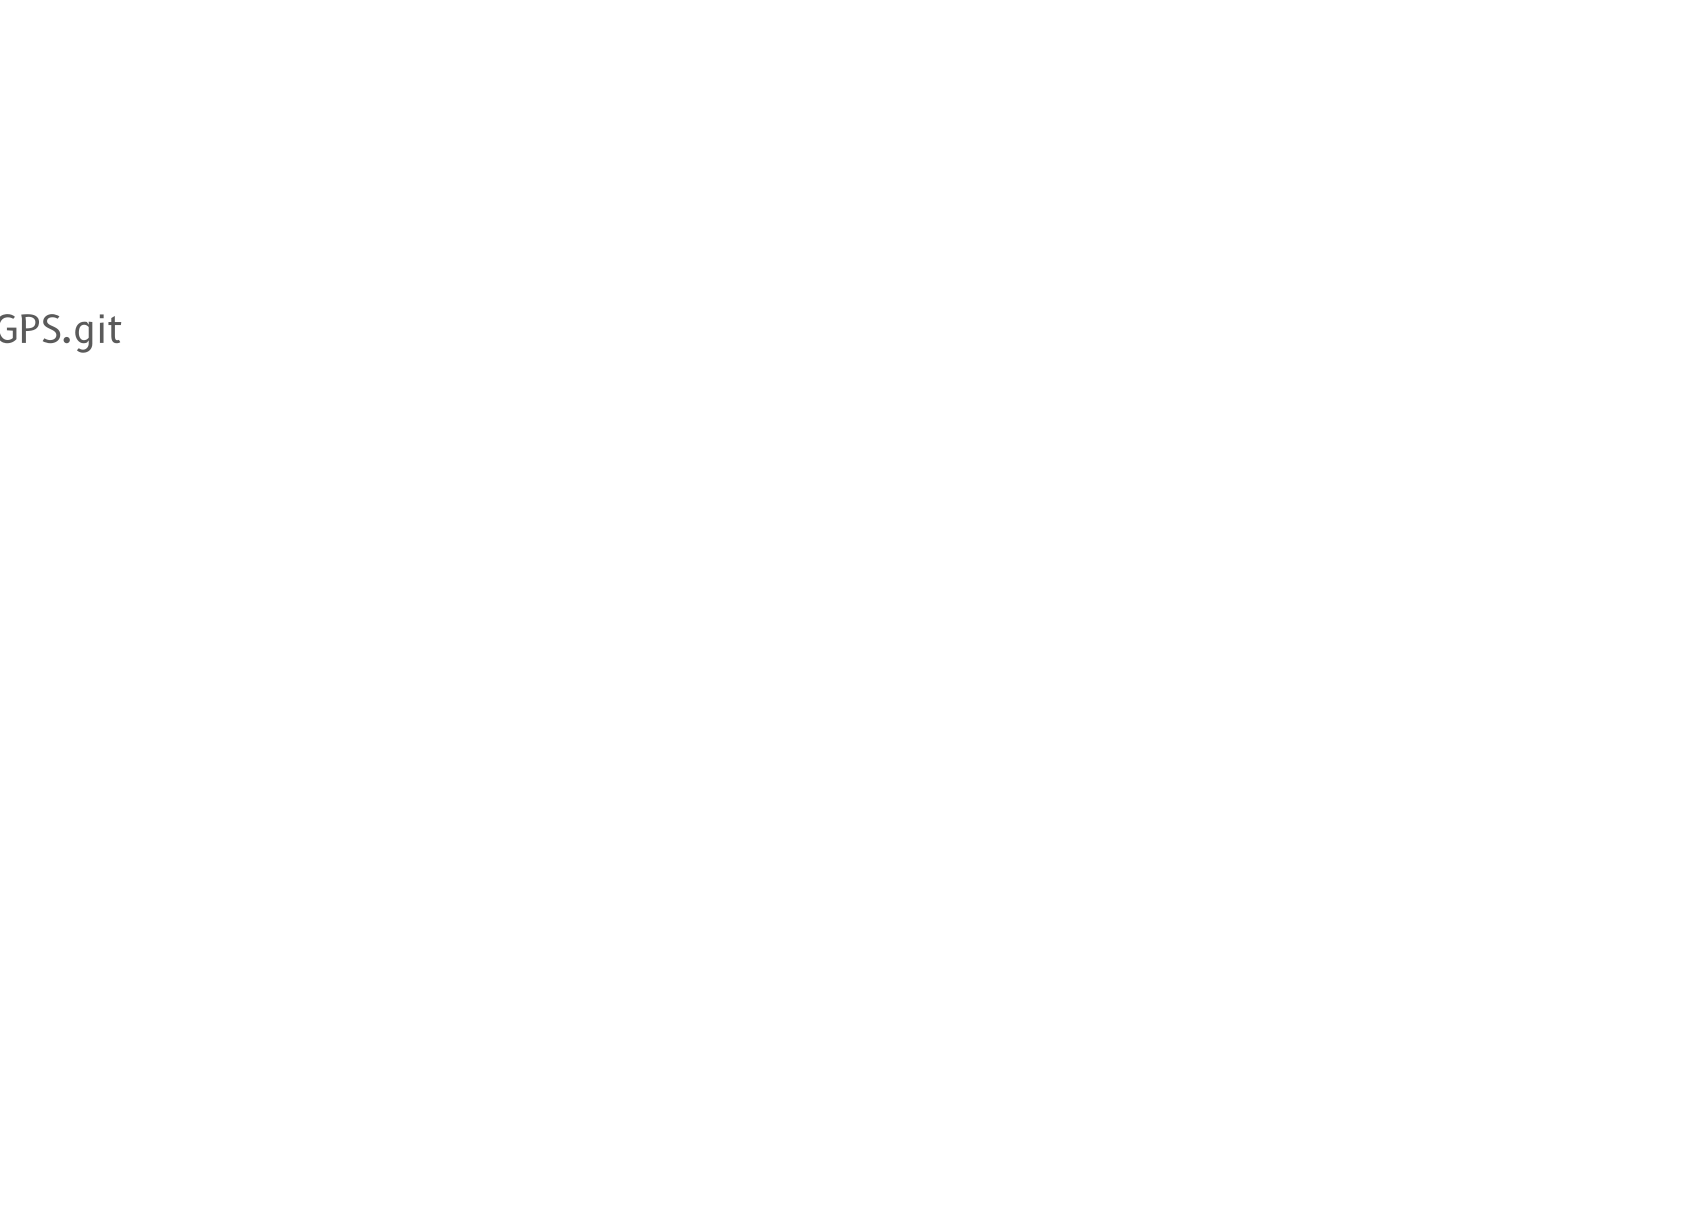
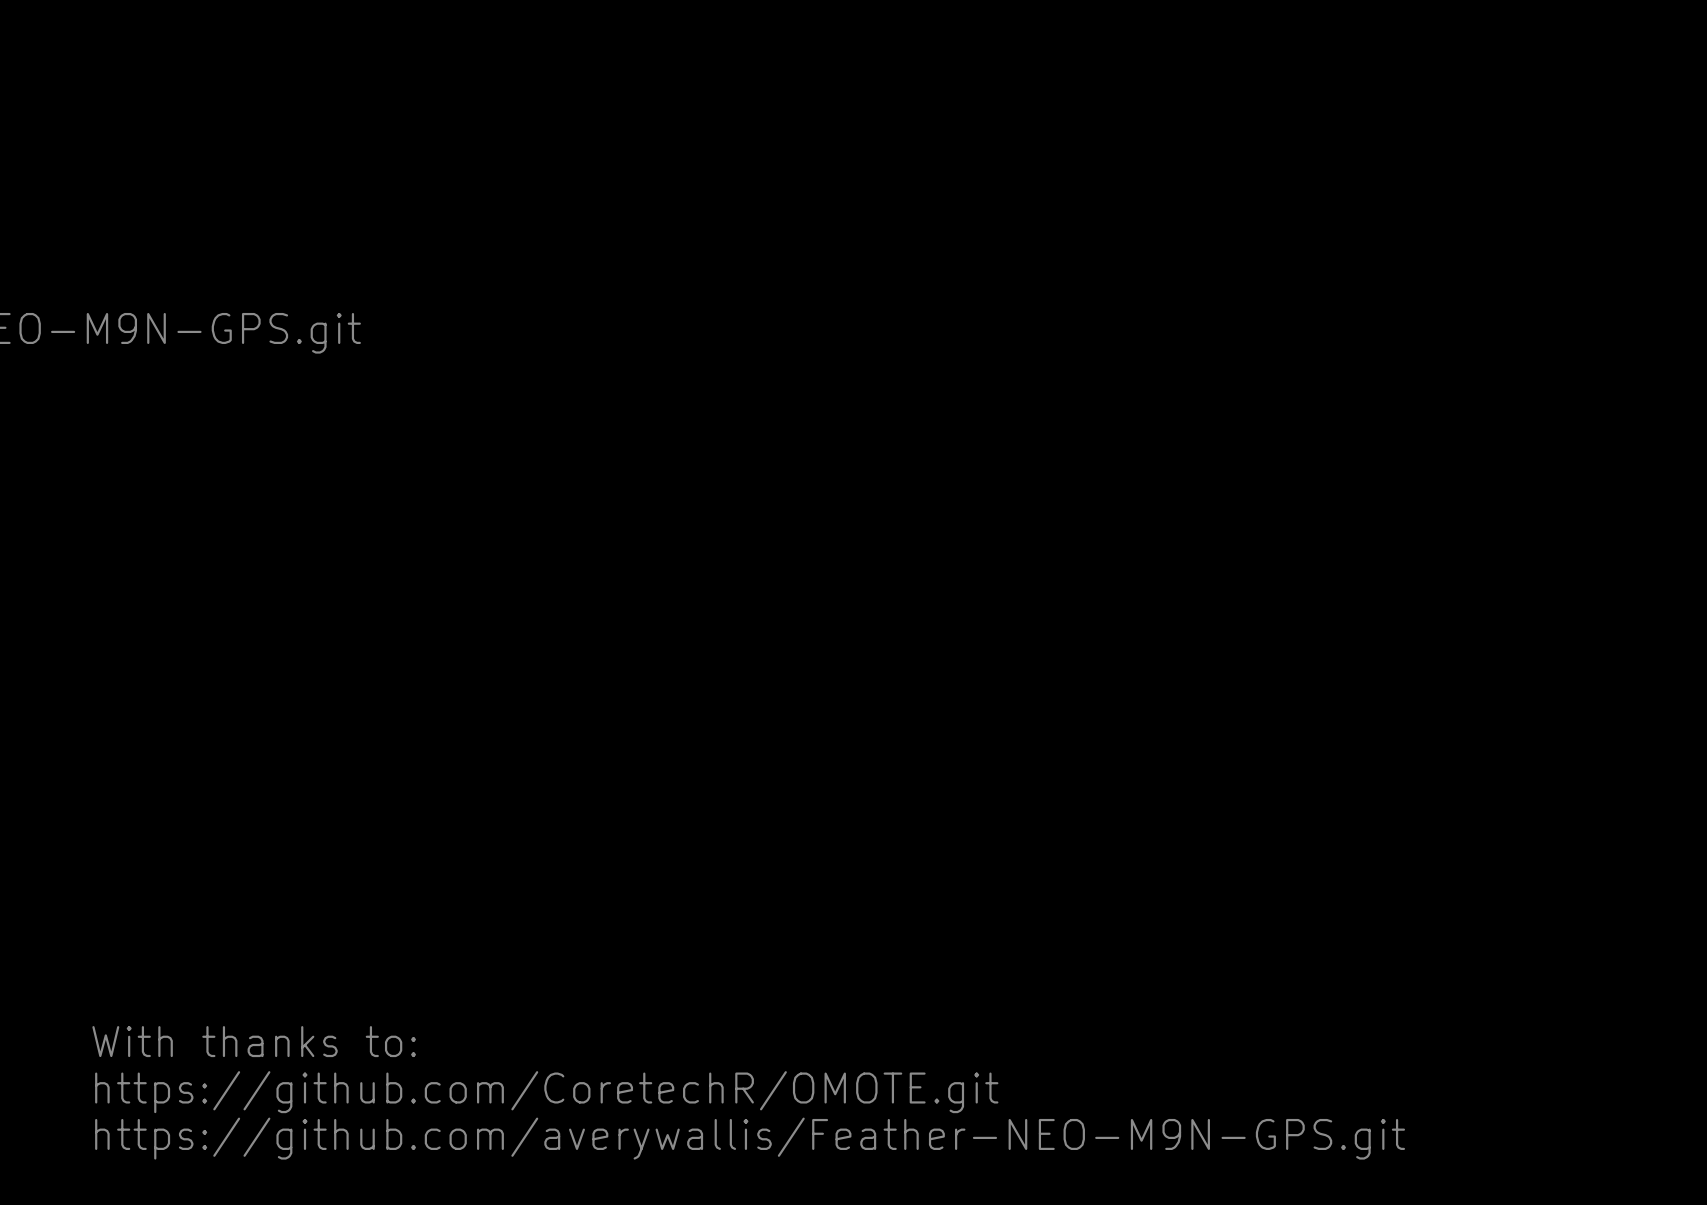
text: none -> With thanks to: (254, 1041)
text: none -> https://github.com/CoretechR/OMOTE.git (546, 1092)
text: none -> https://github.com/averywallis/Feather-NEO-M9N-GPS.git (750, 1138)

